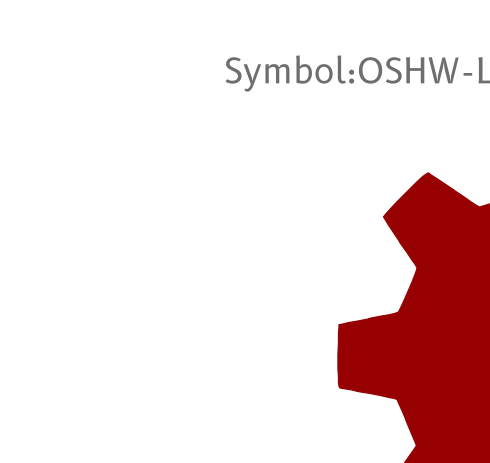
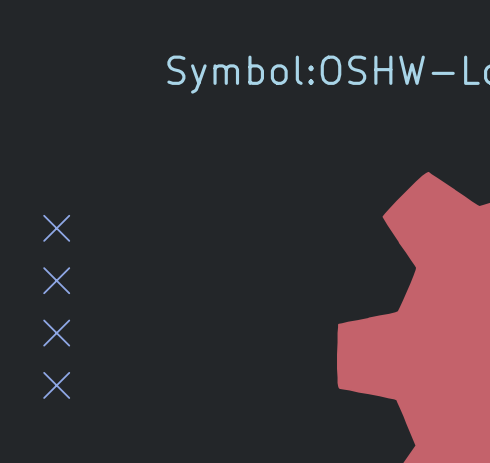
no-connect mark: none -> (56, 228)
no-connect mark: none -> (56, 280)
no-connect mark: none -> (56, 333)
no-connect mark: none -> (56, 385)

